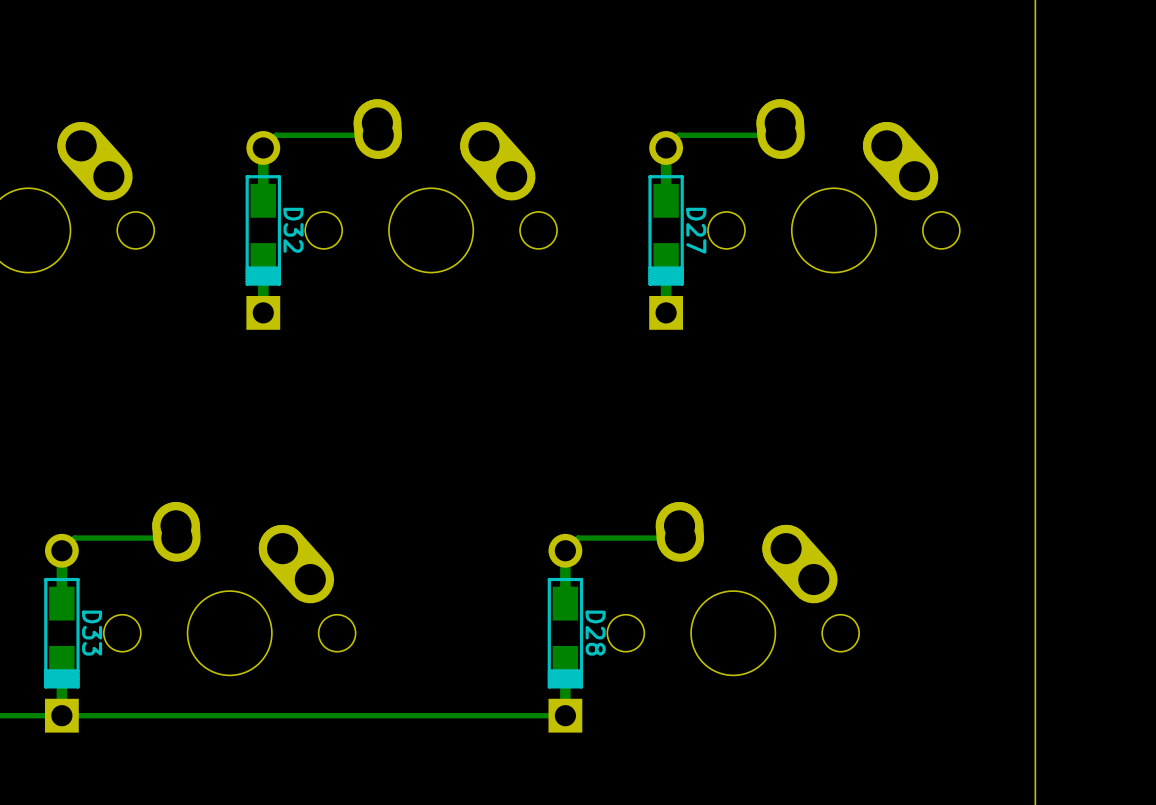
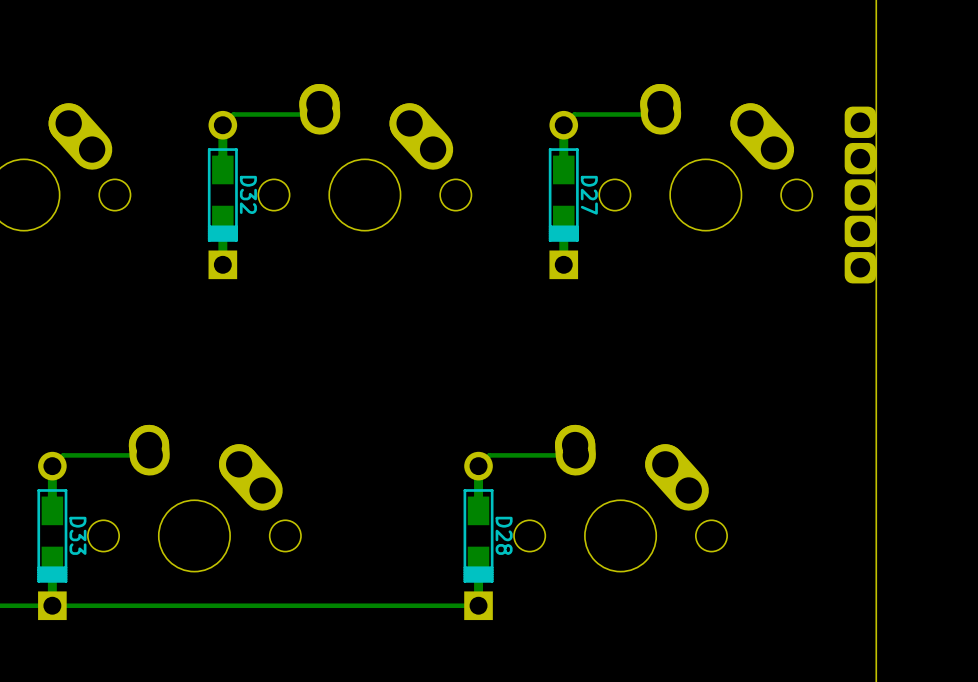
part: none -> (860, 195)

